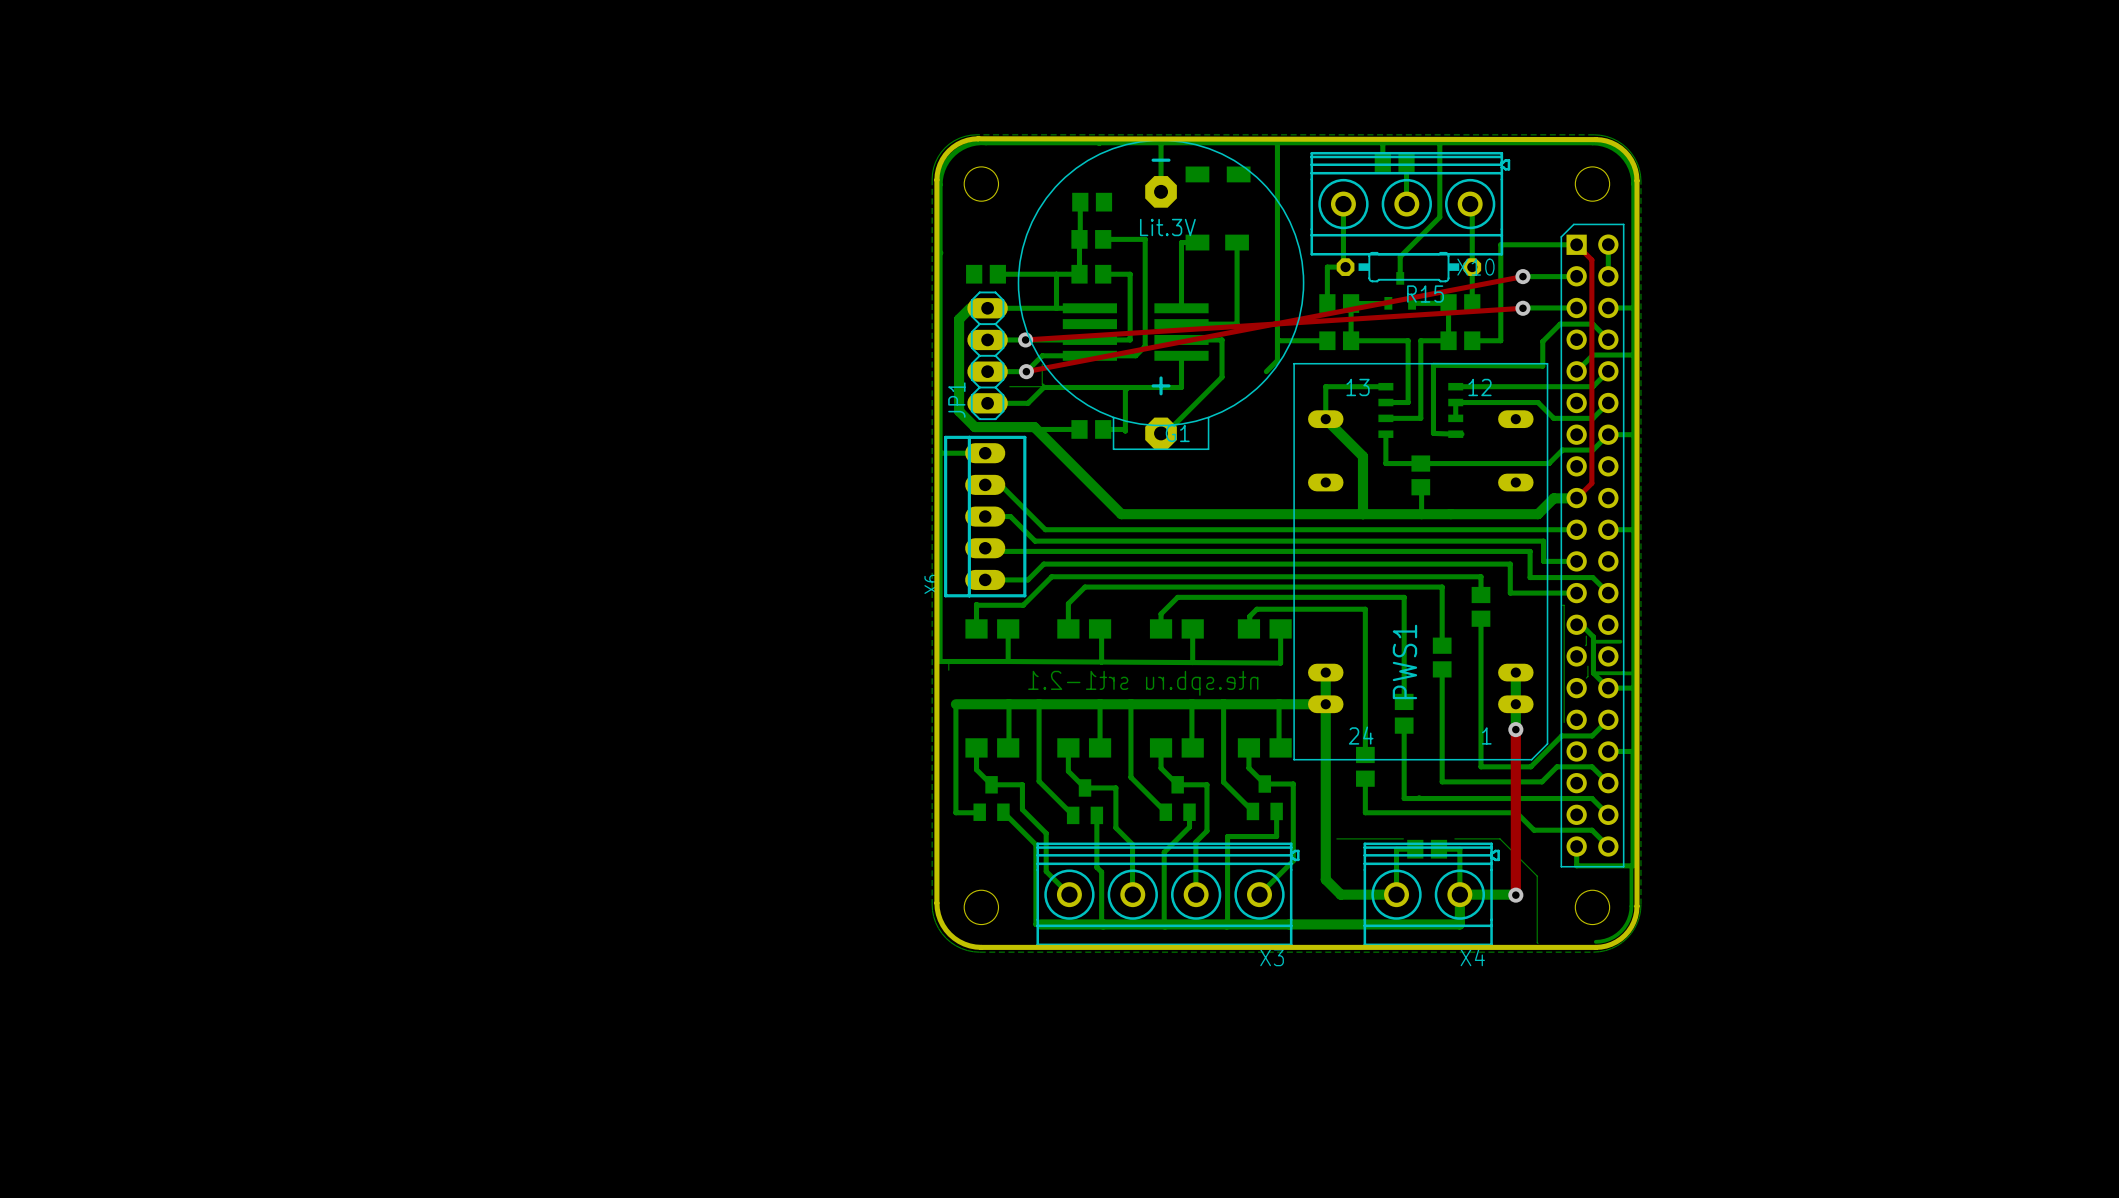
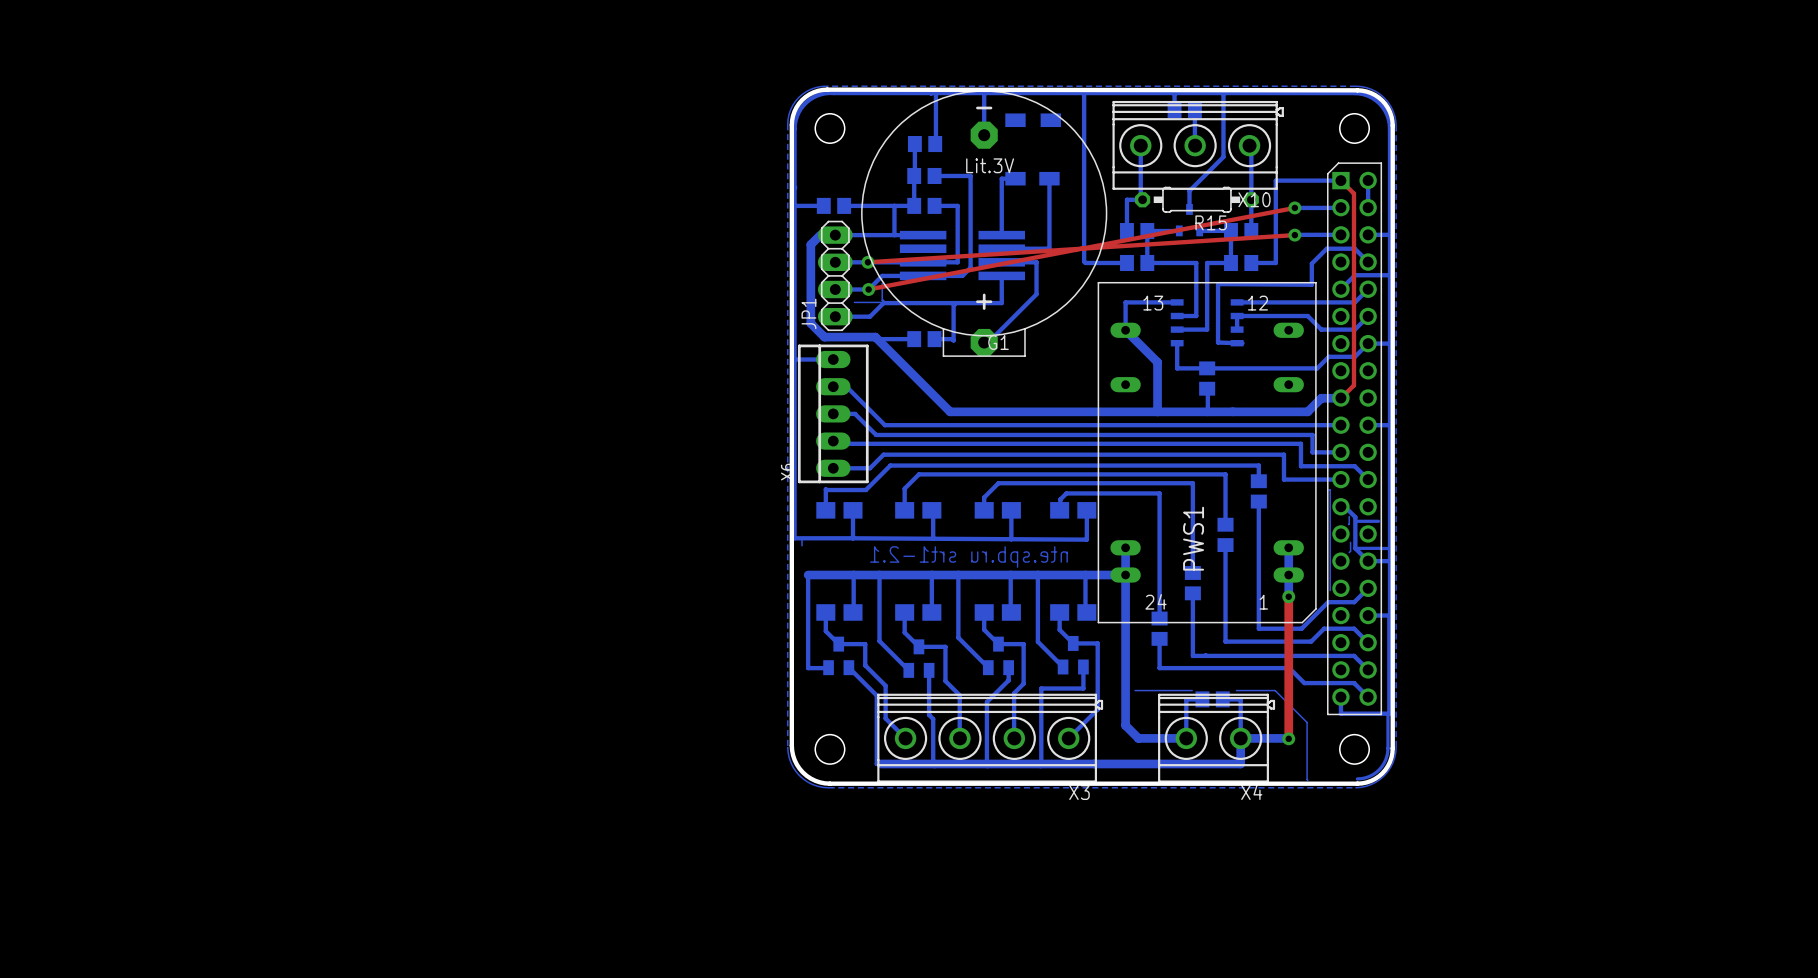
bottom track: none -> (935, 93) (935, 144)
bottom track: none -> (794, 205) (823, 205)
bottom track: (1277, 339) (1277, 360) (1266, 371) -> none

